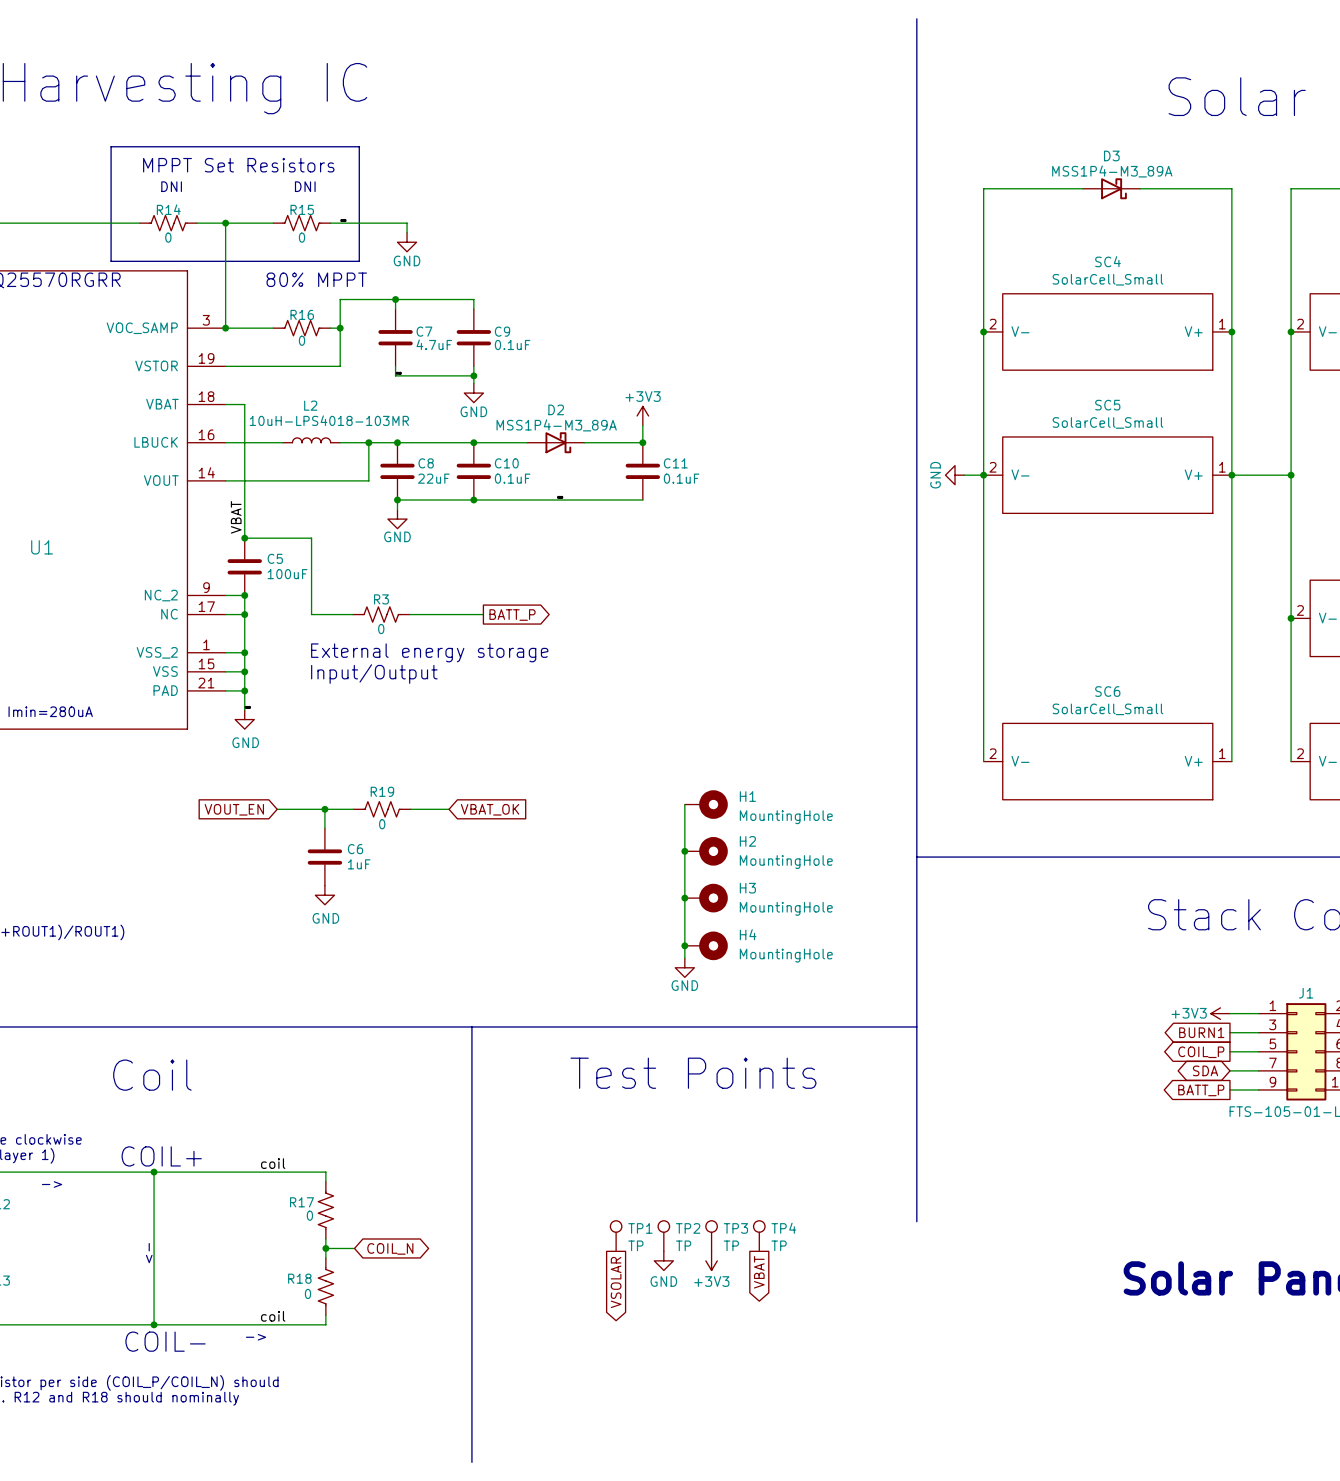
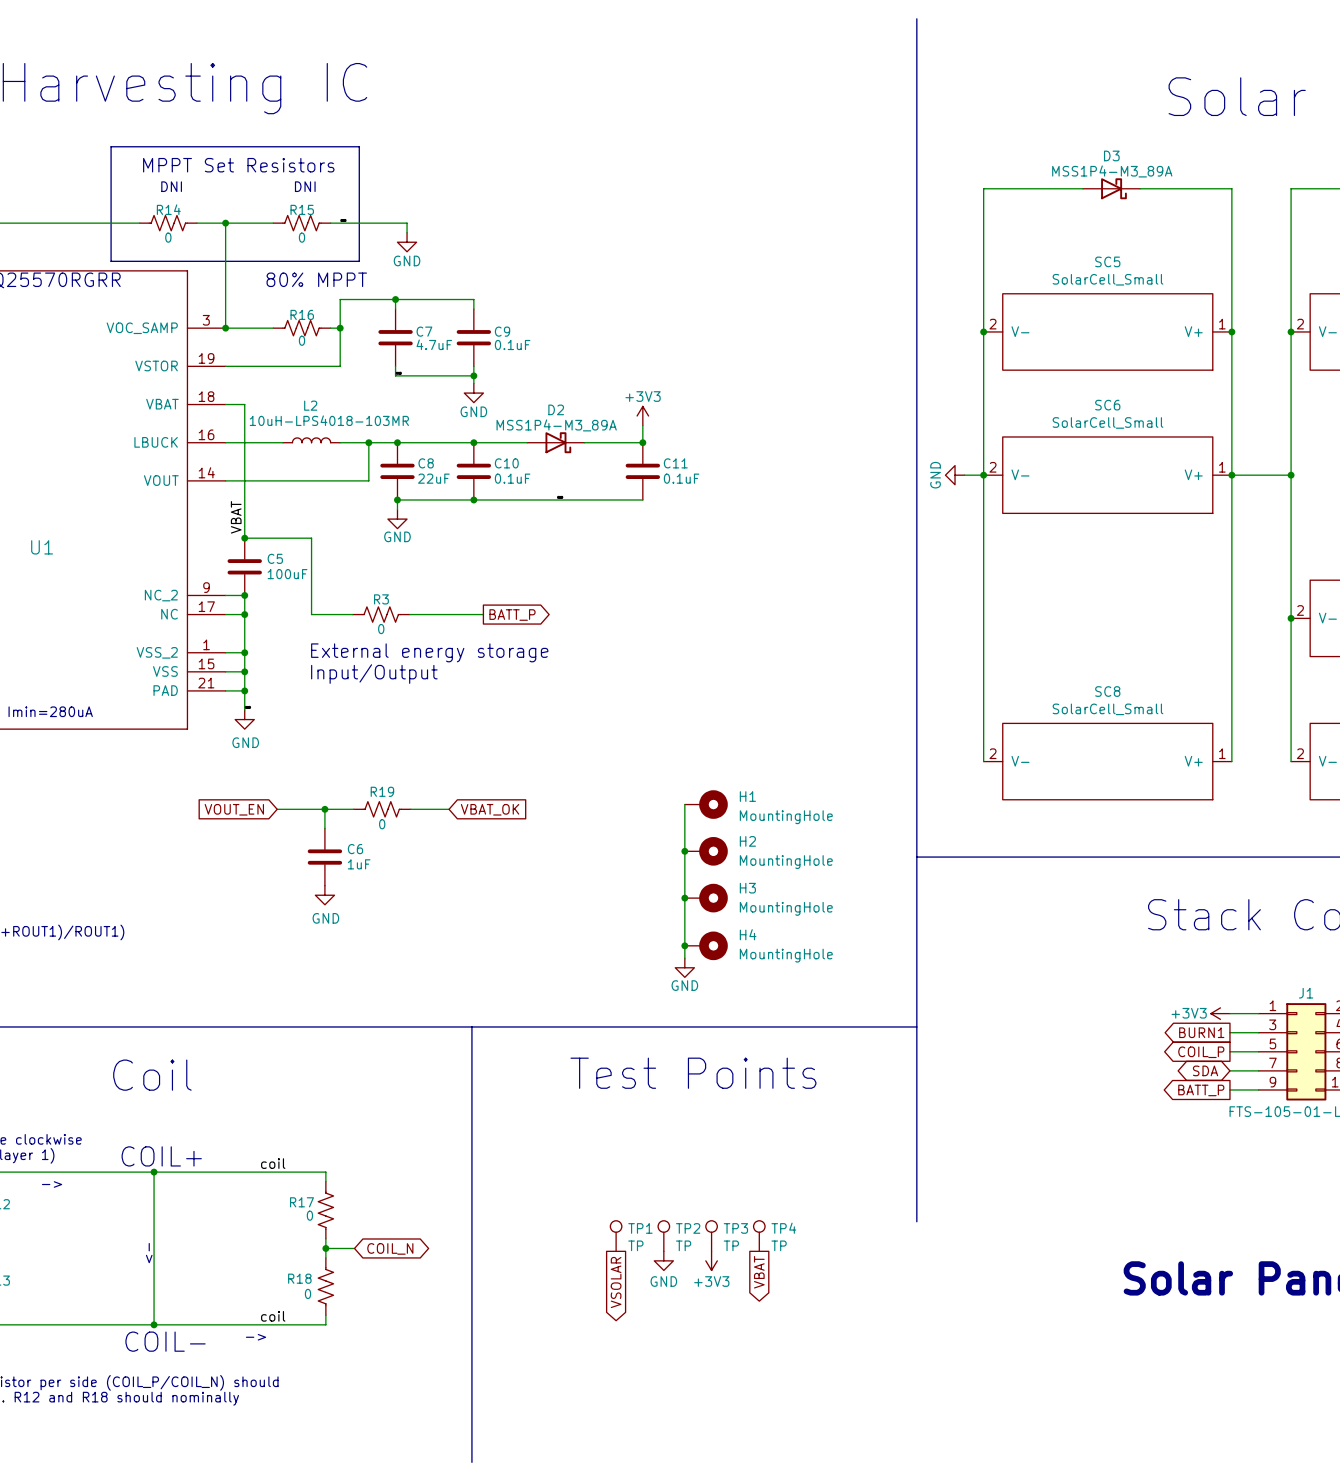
SC4 name: SC4 (1107, 261) -> SC5 (1107, 261)
SC5 name: SC5 (1107, 405) -> SC6 (1107, 405)
SC6 name: SC6 (1107, 691) -> SC8 (1107, 691)

